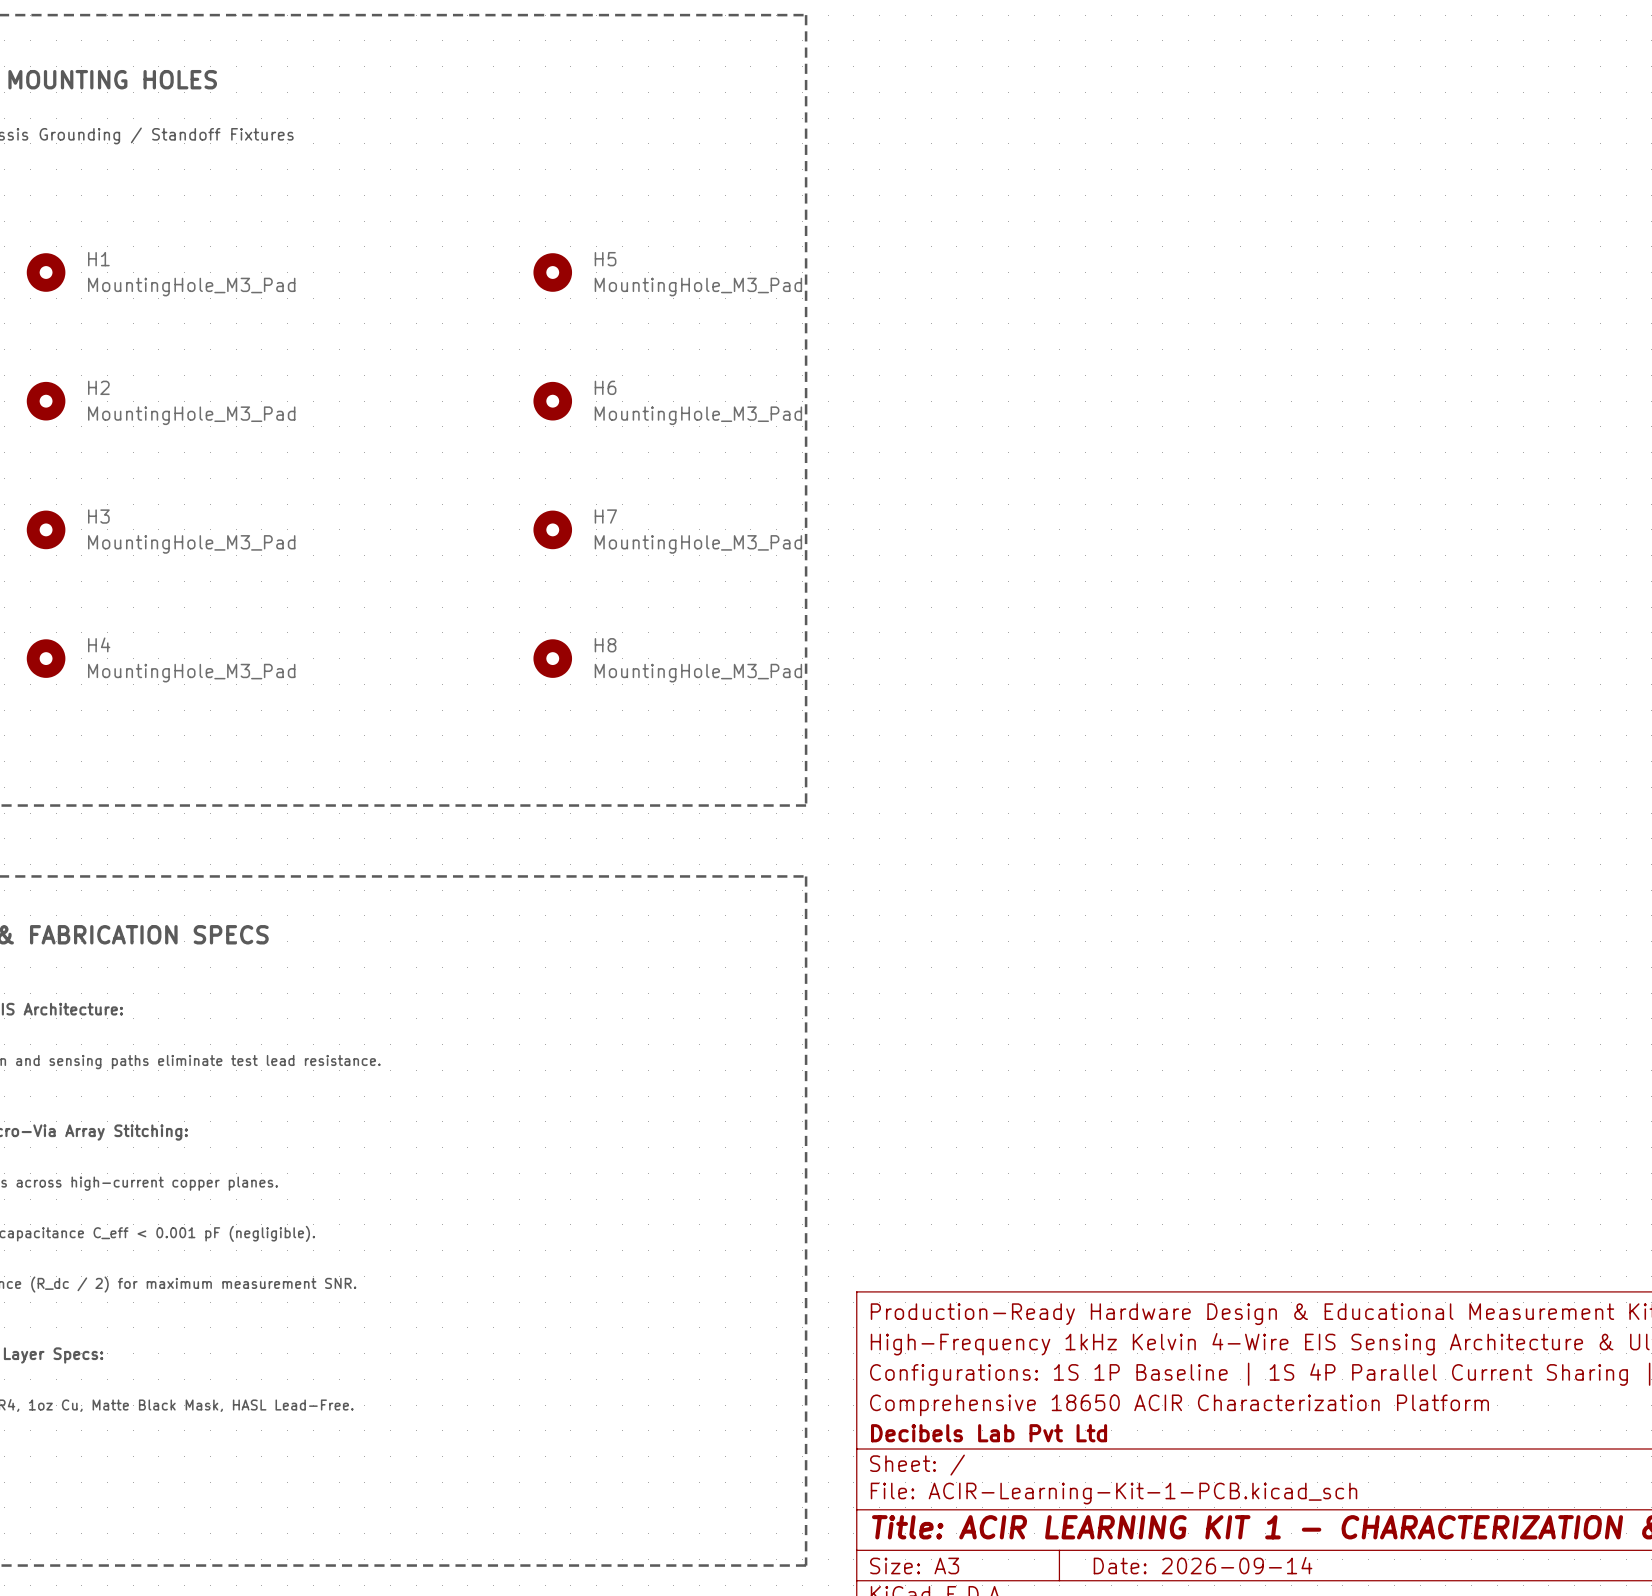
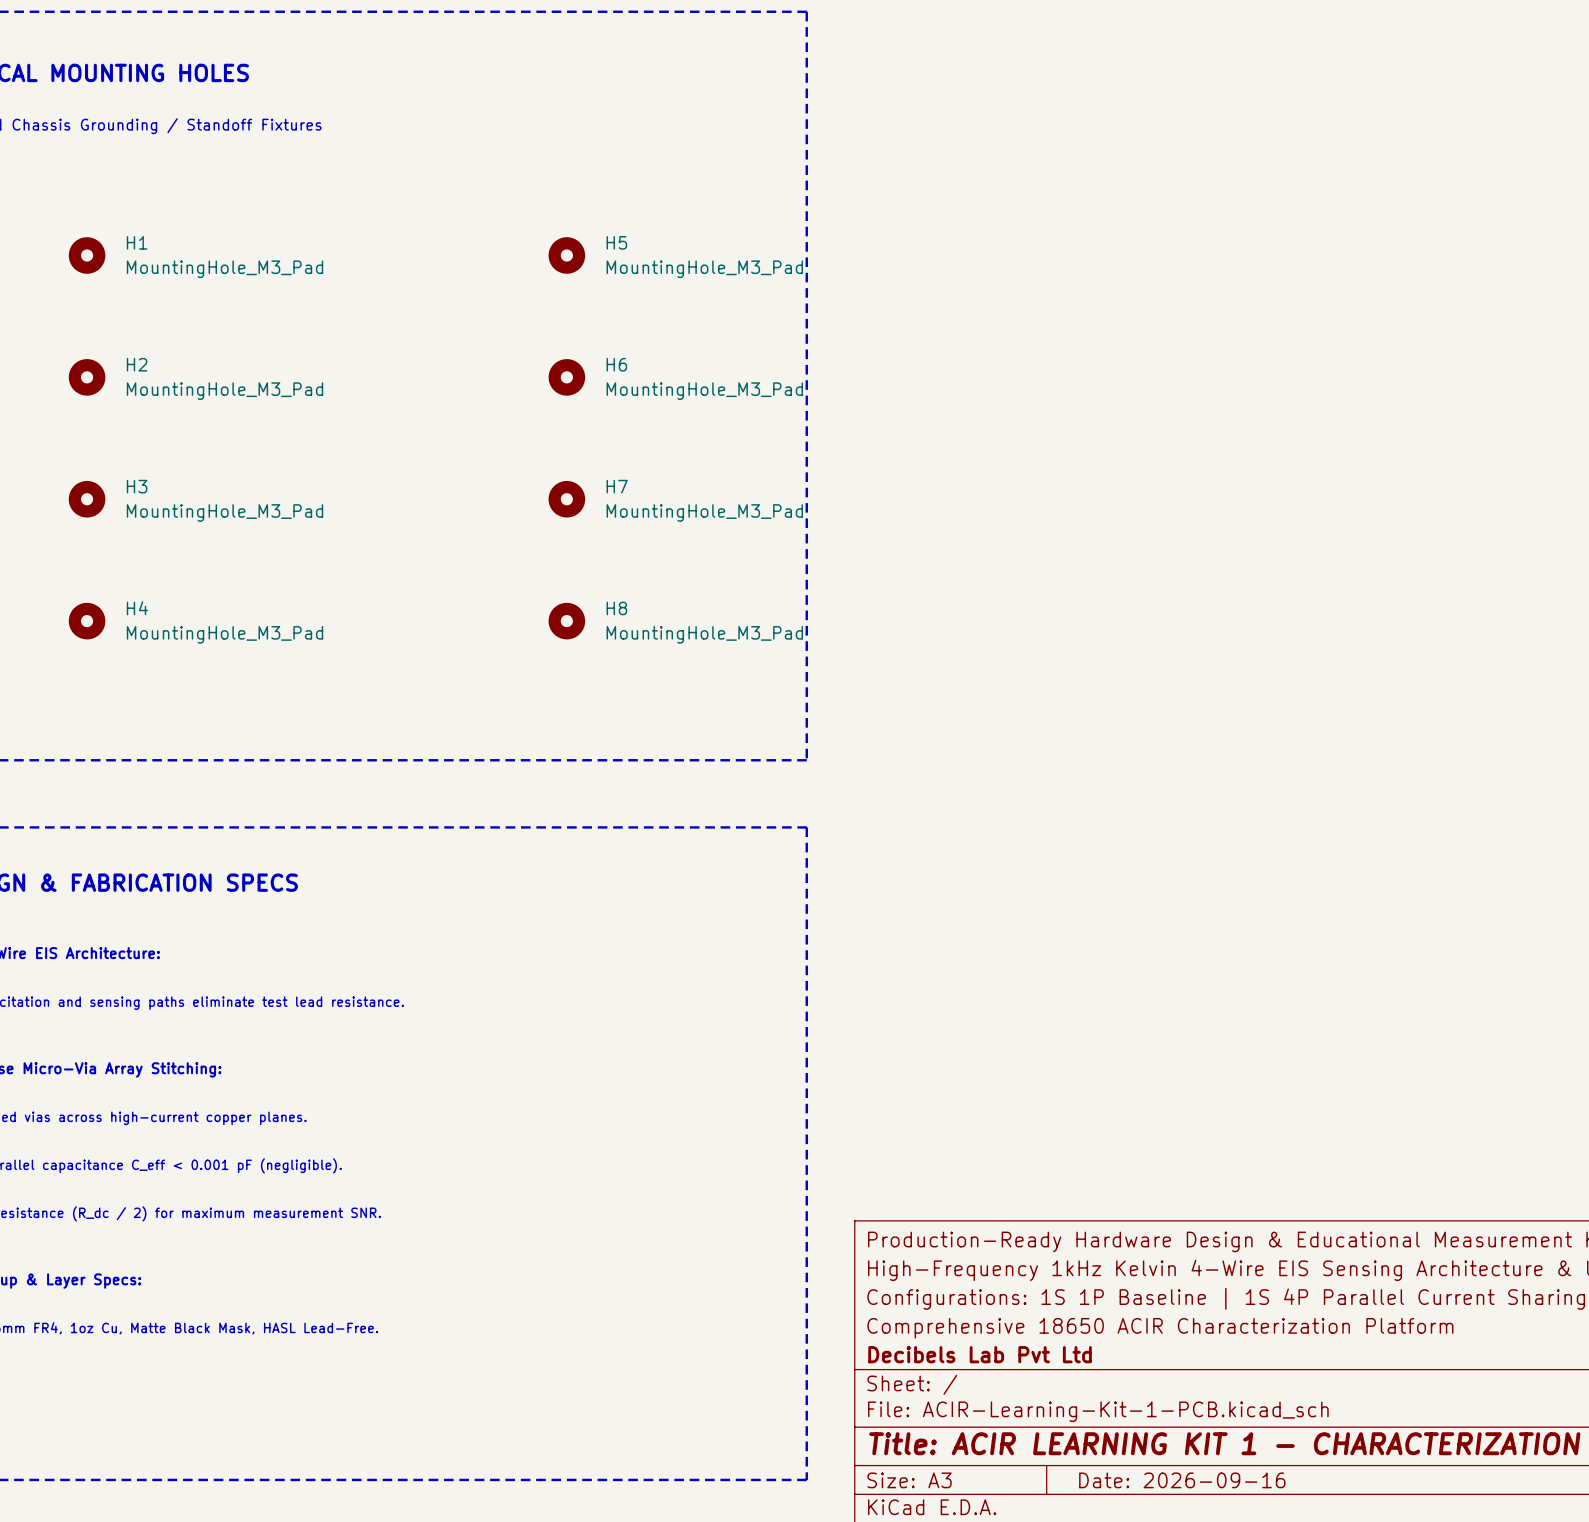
title block: Date: 2026-09-14 (1203, 1565) -> Date: 2026-09-16 (1182, 1480)

